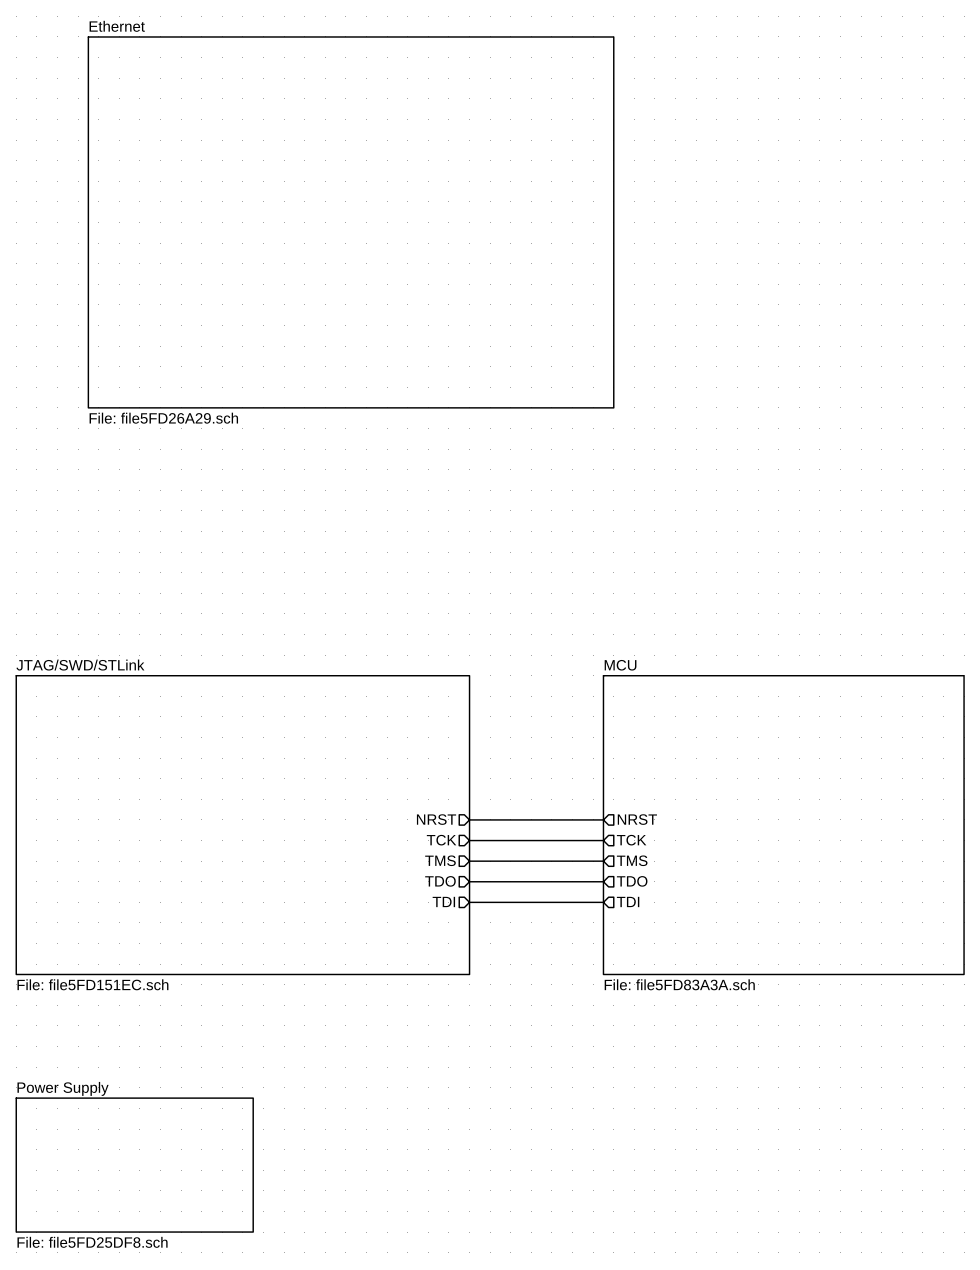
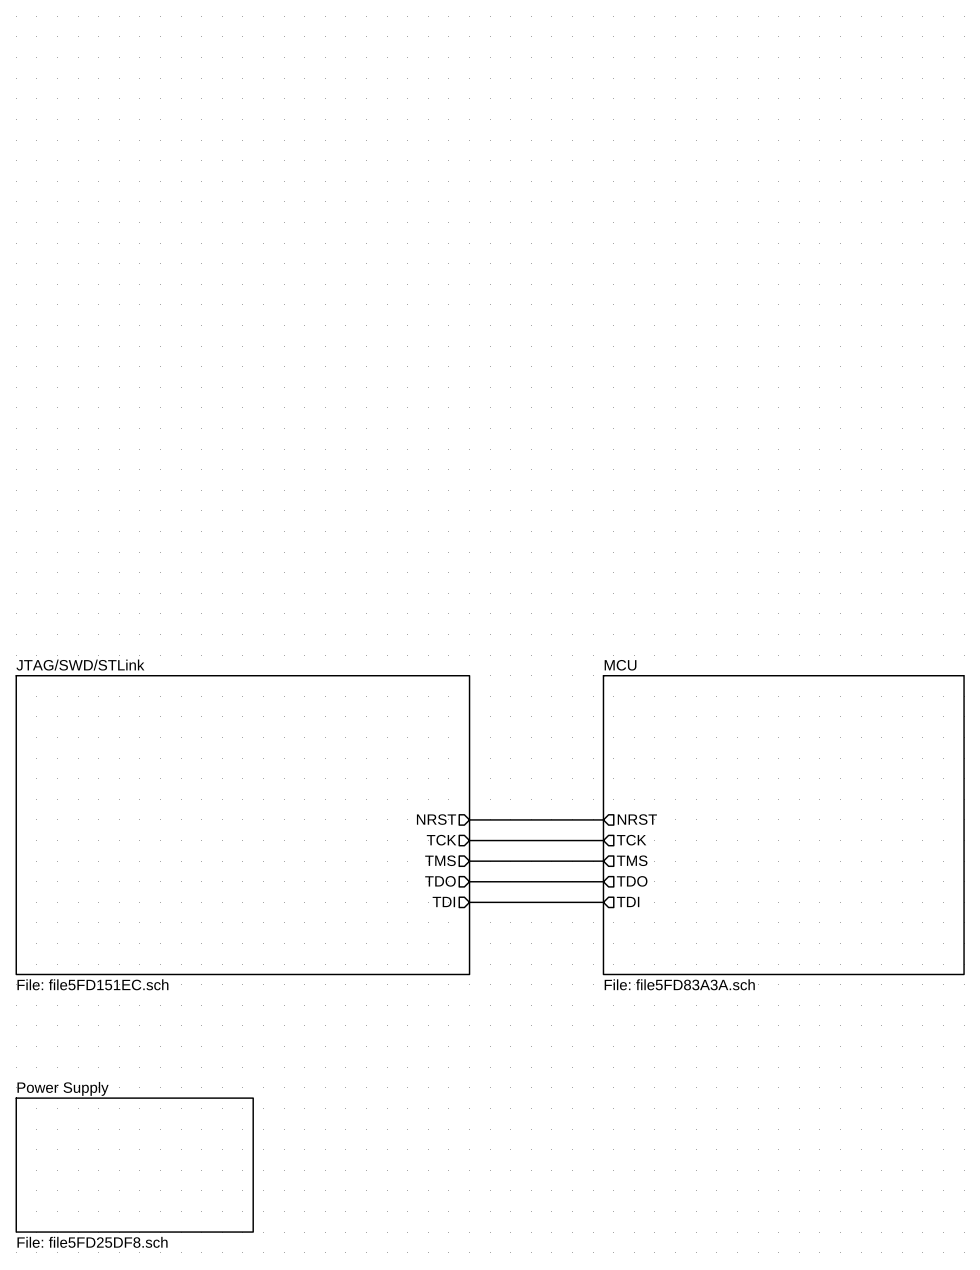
sheet Ethernet: File: file5FD26A29.sch (351, 222) -> none

